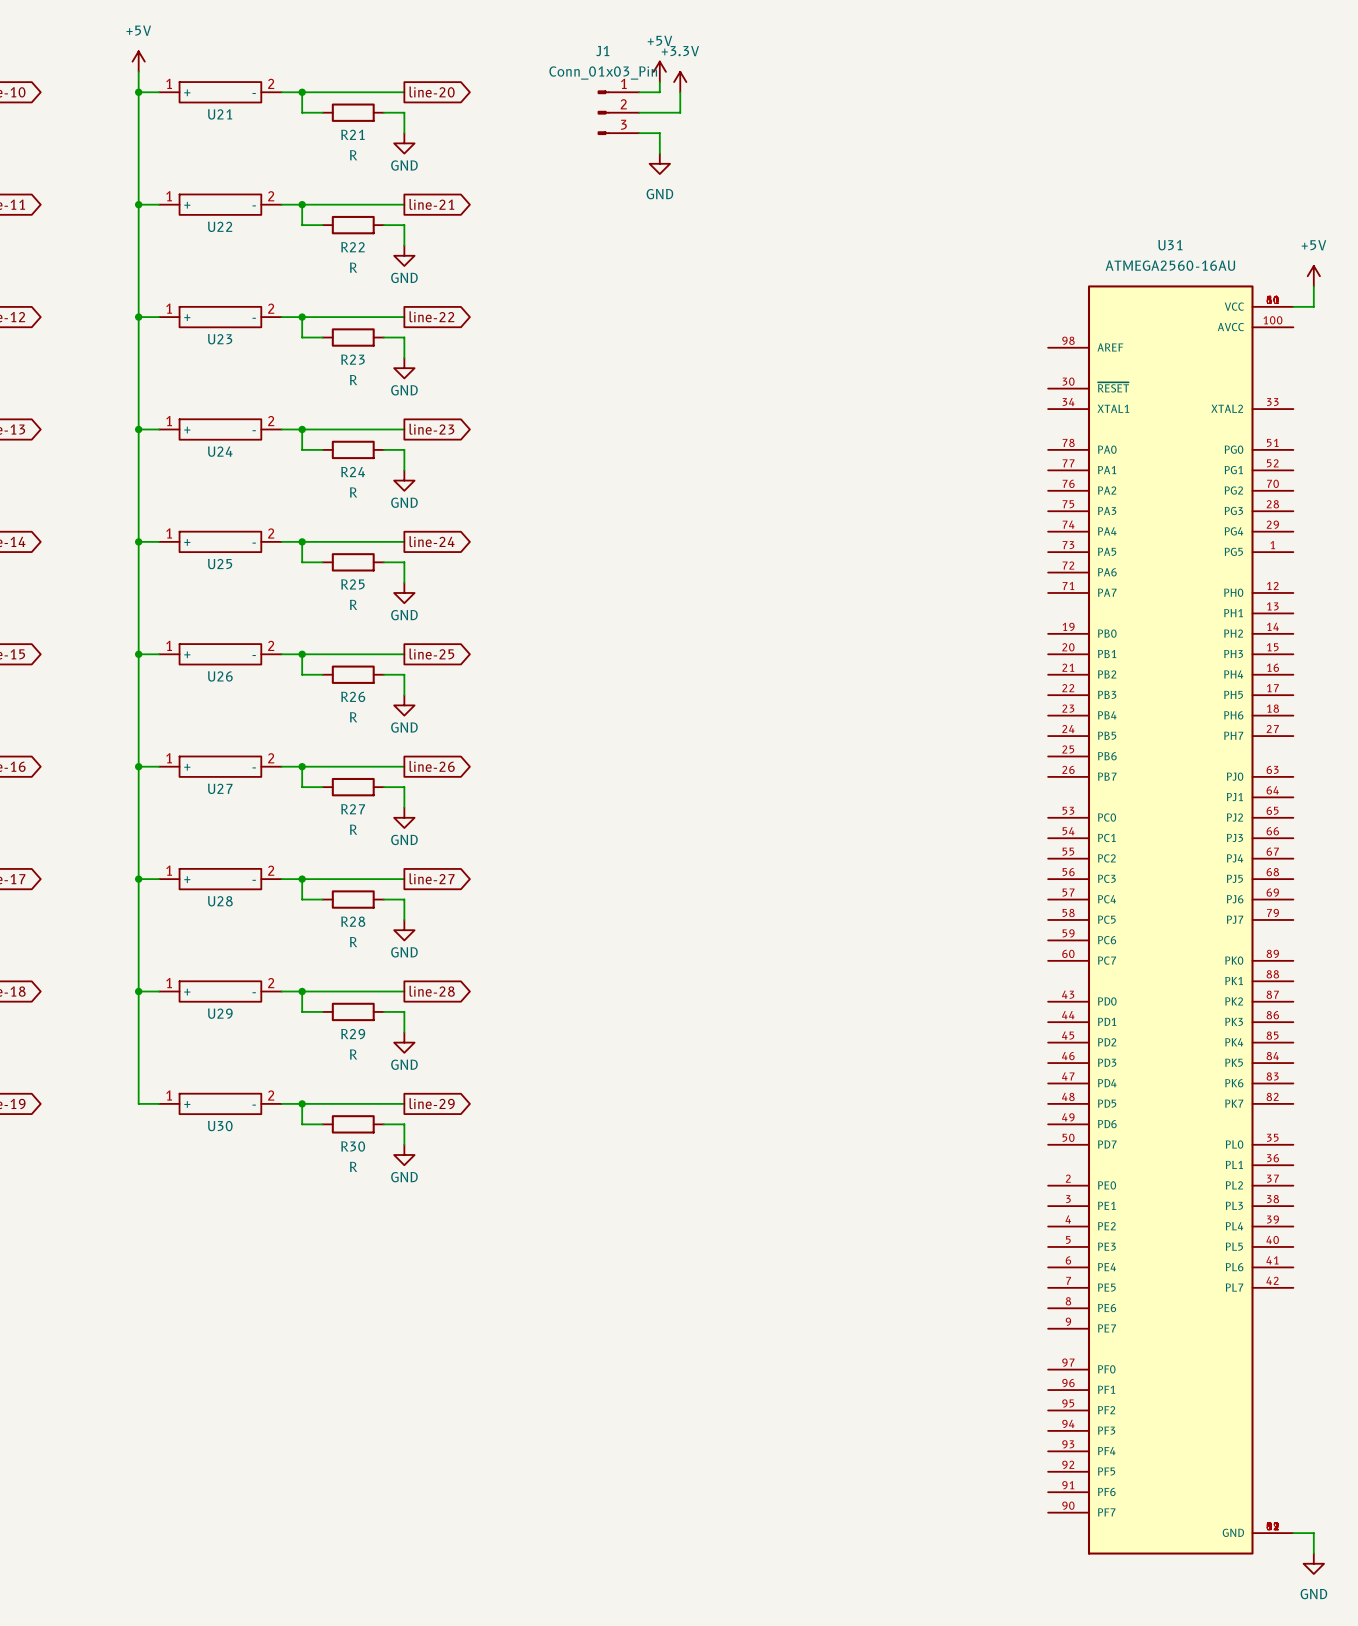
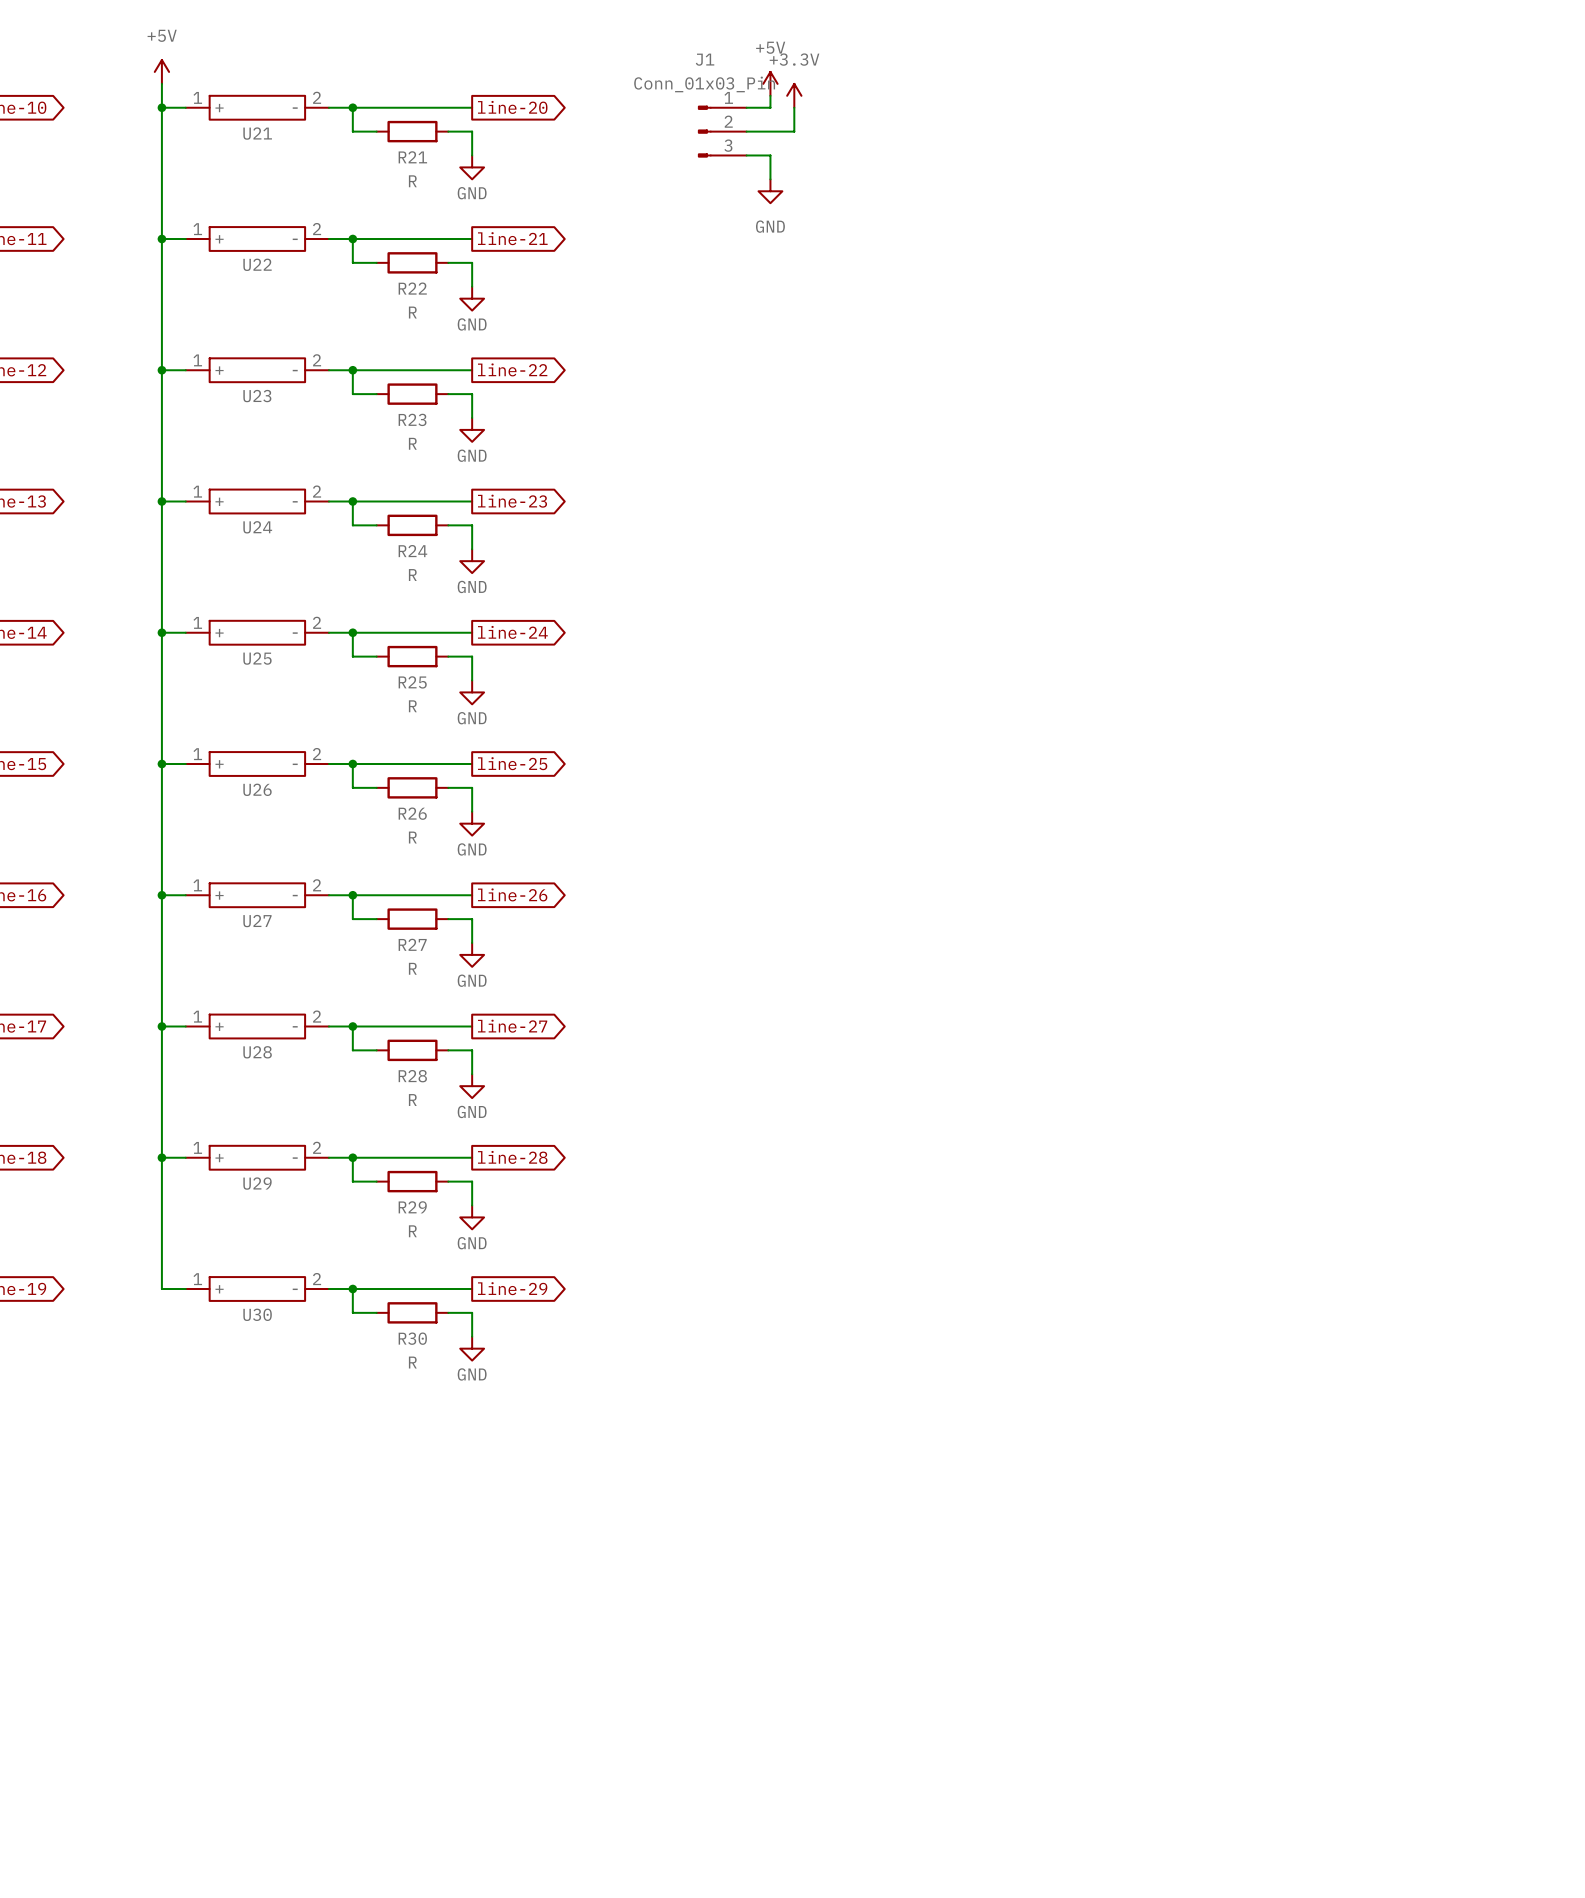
power symbol: +5V (1313, 276) -> none
wire: (1313, 286) (1313, 306) (1293, 306) -> none
U31: ATMEGA2560-16AU (1170, 919) -> none
wire: (1293, 1533) (1313, 1533) (1313, 1553) -> none
power symbol: GND (1313, 1563) -> none

